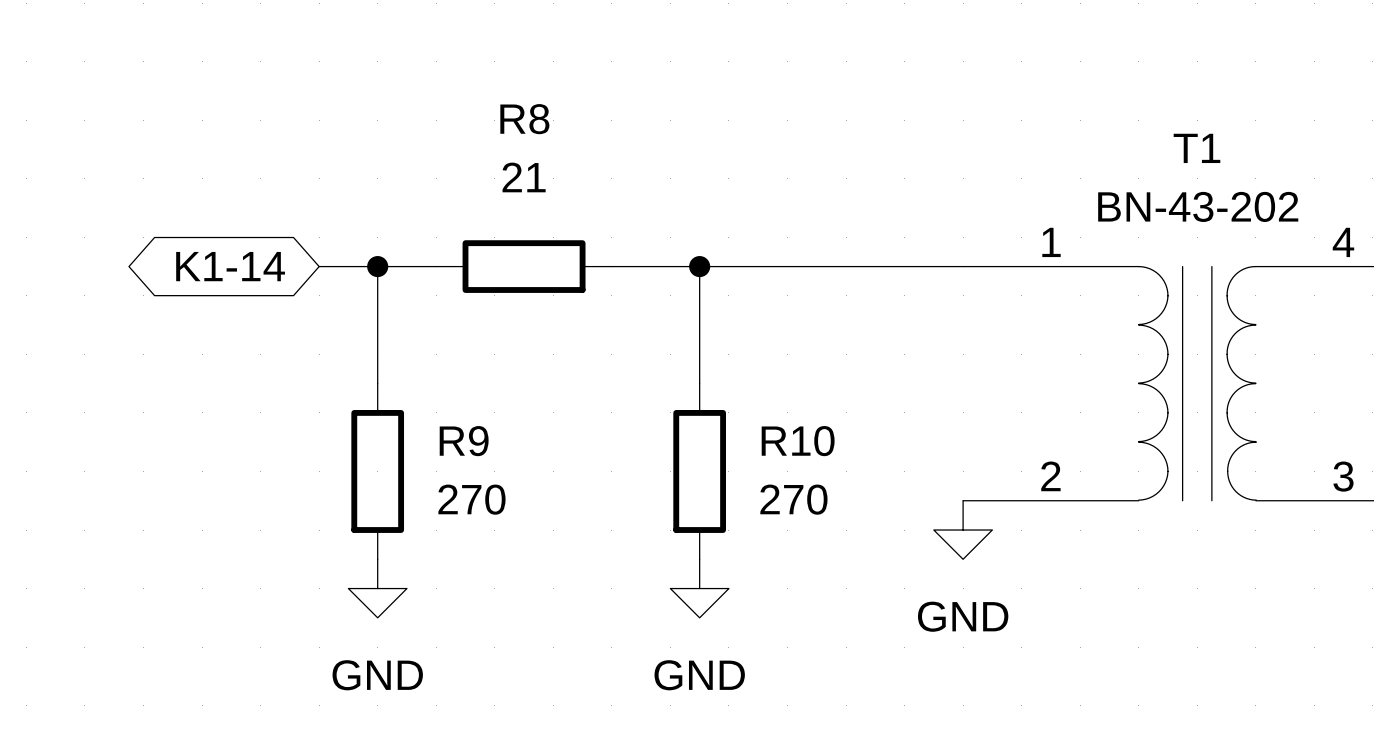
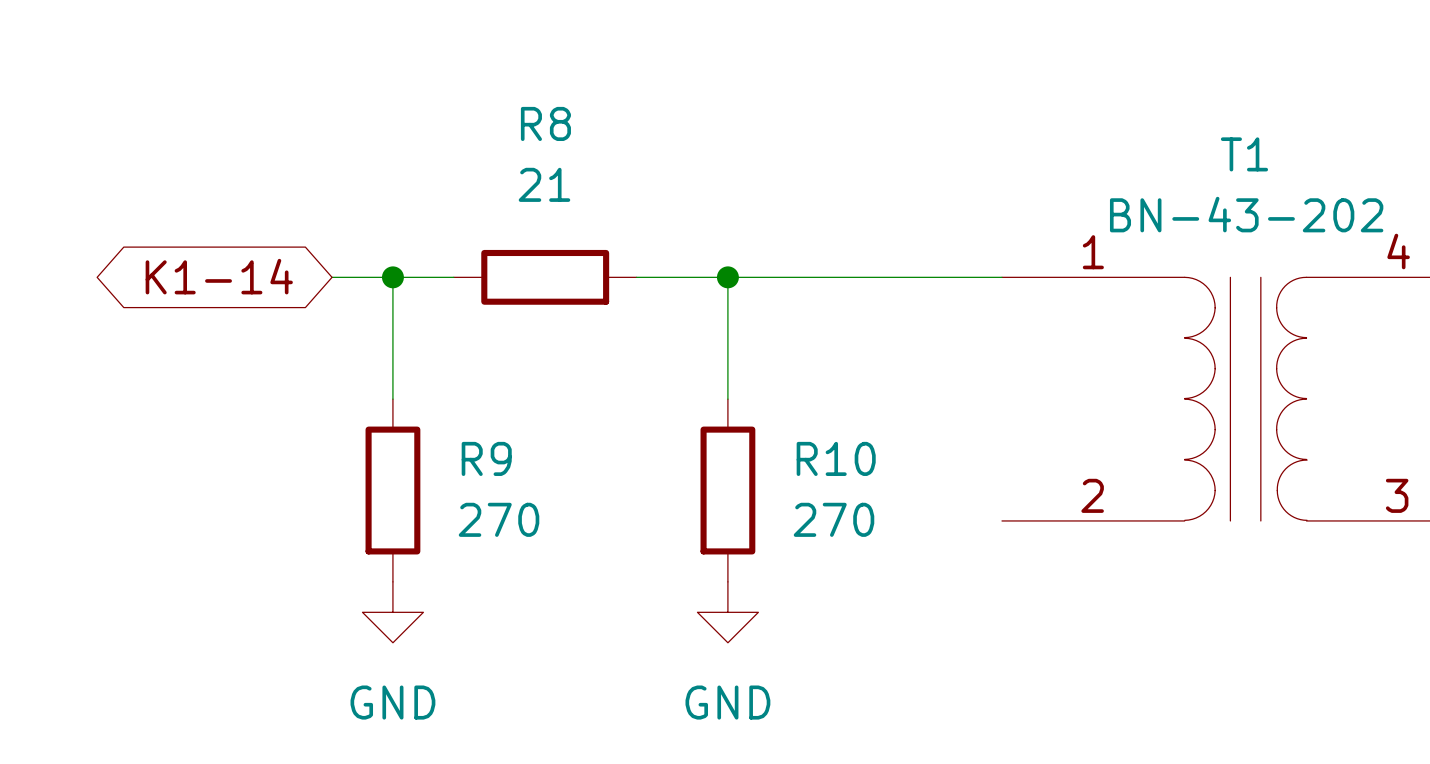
power symbol: GND (963, 530) -> none

